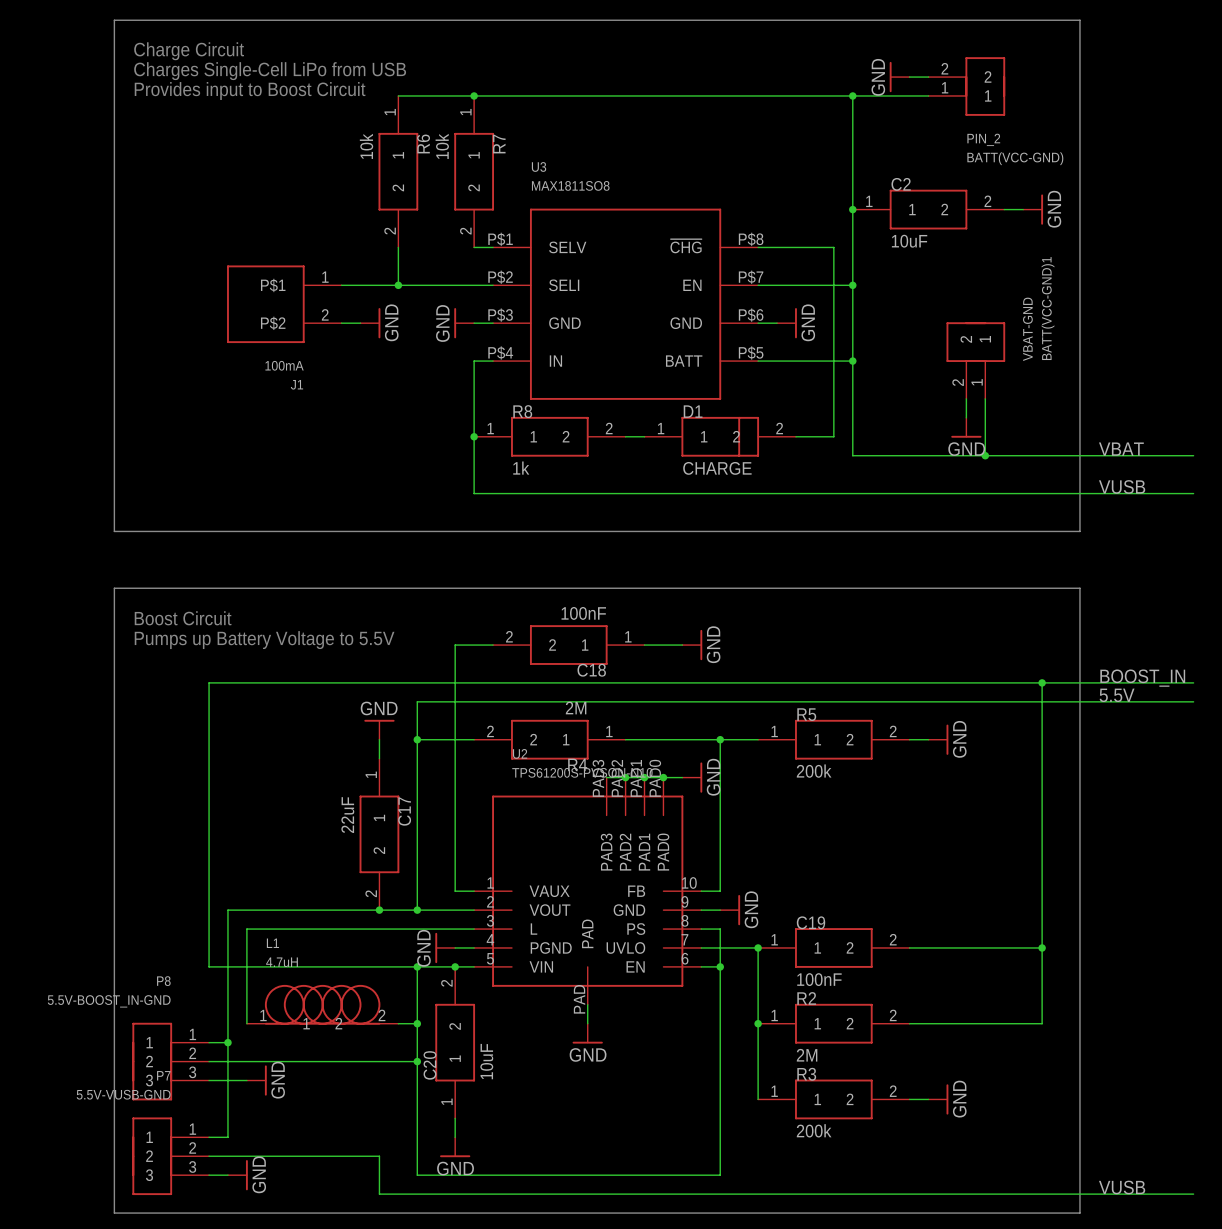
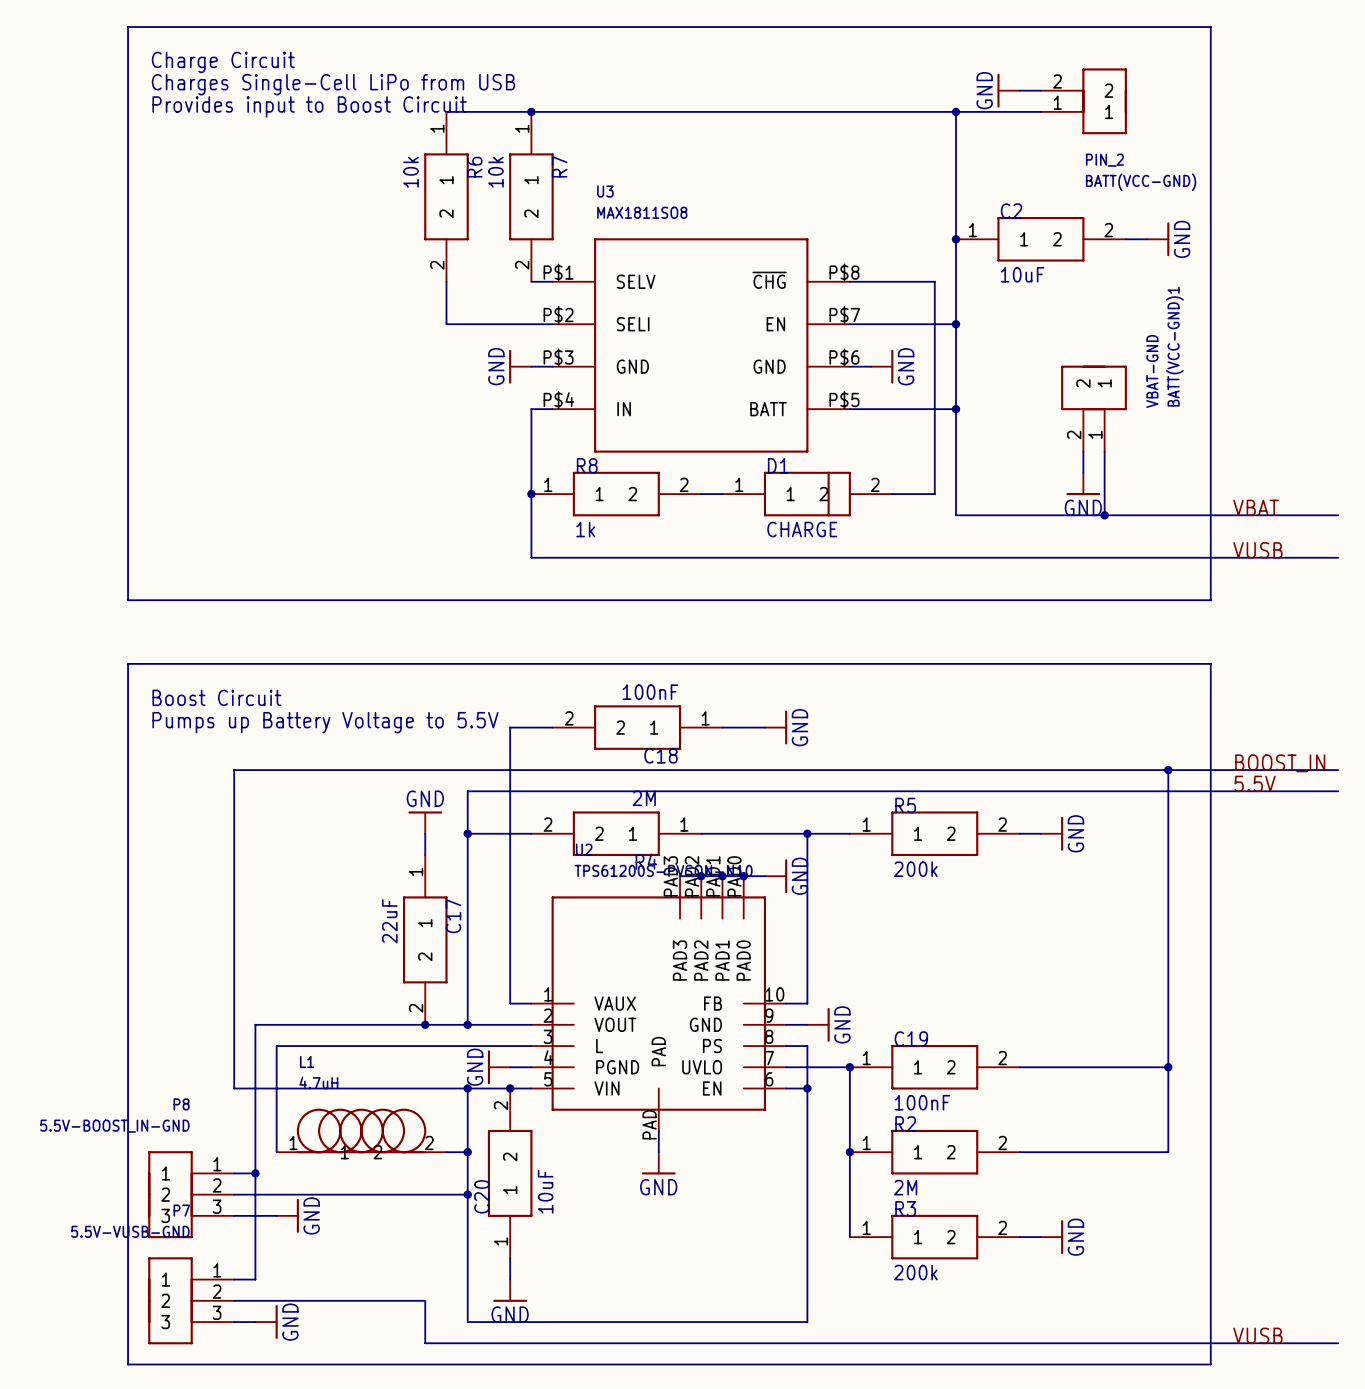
wire: (341, 285) (398, 285) -> none
junction: (398, 285) -> none
J1: 100mA (284, 304) -> none
wire: (341, 323) (360, 323) -> none
power symbol: GND (370, 323) -> none

